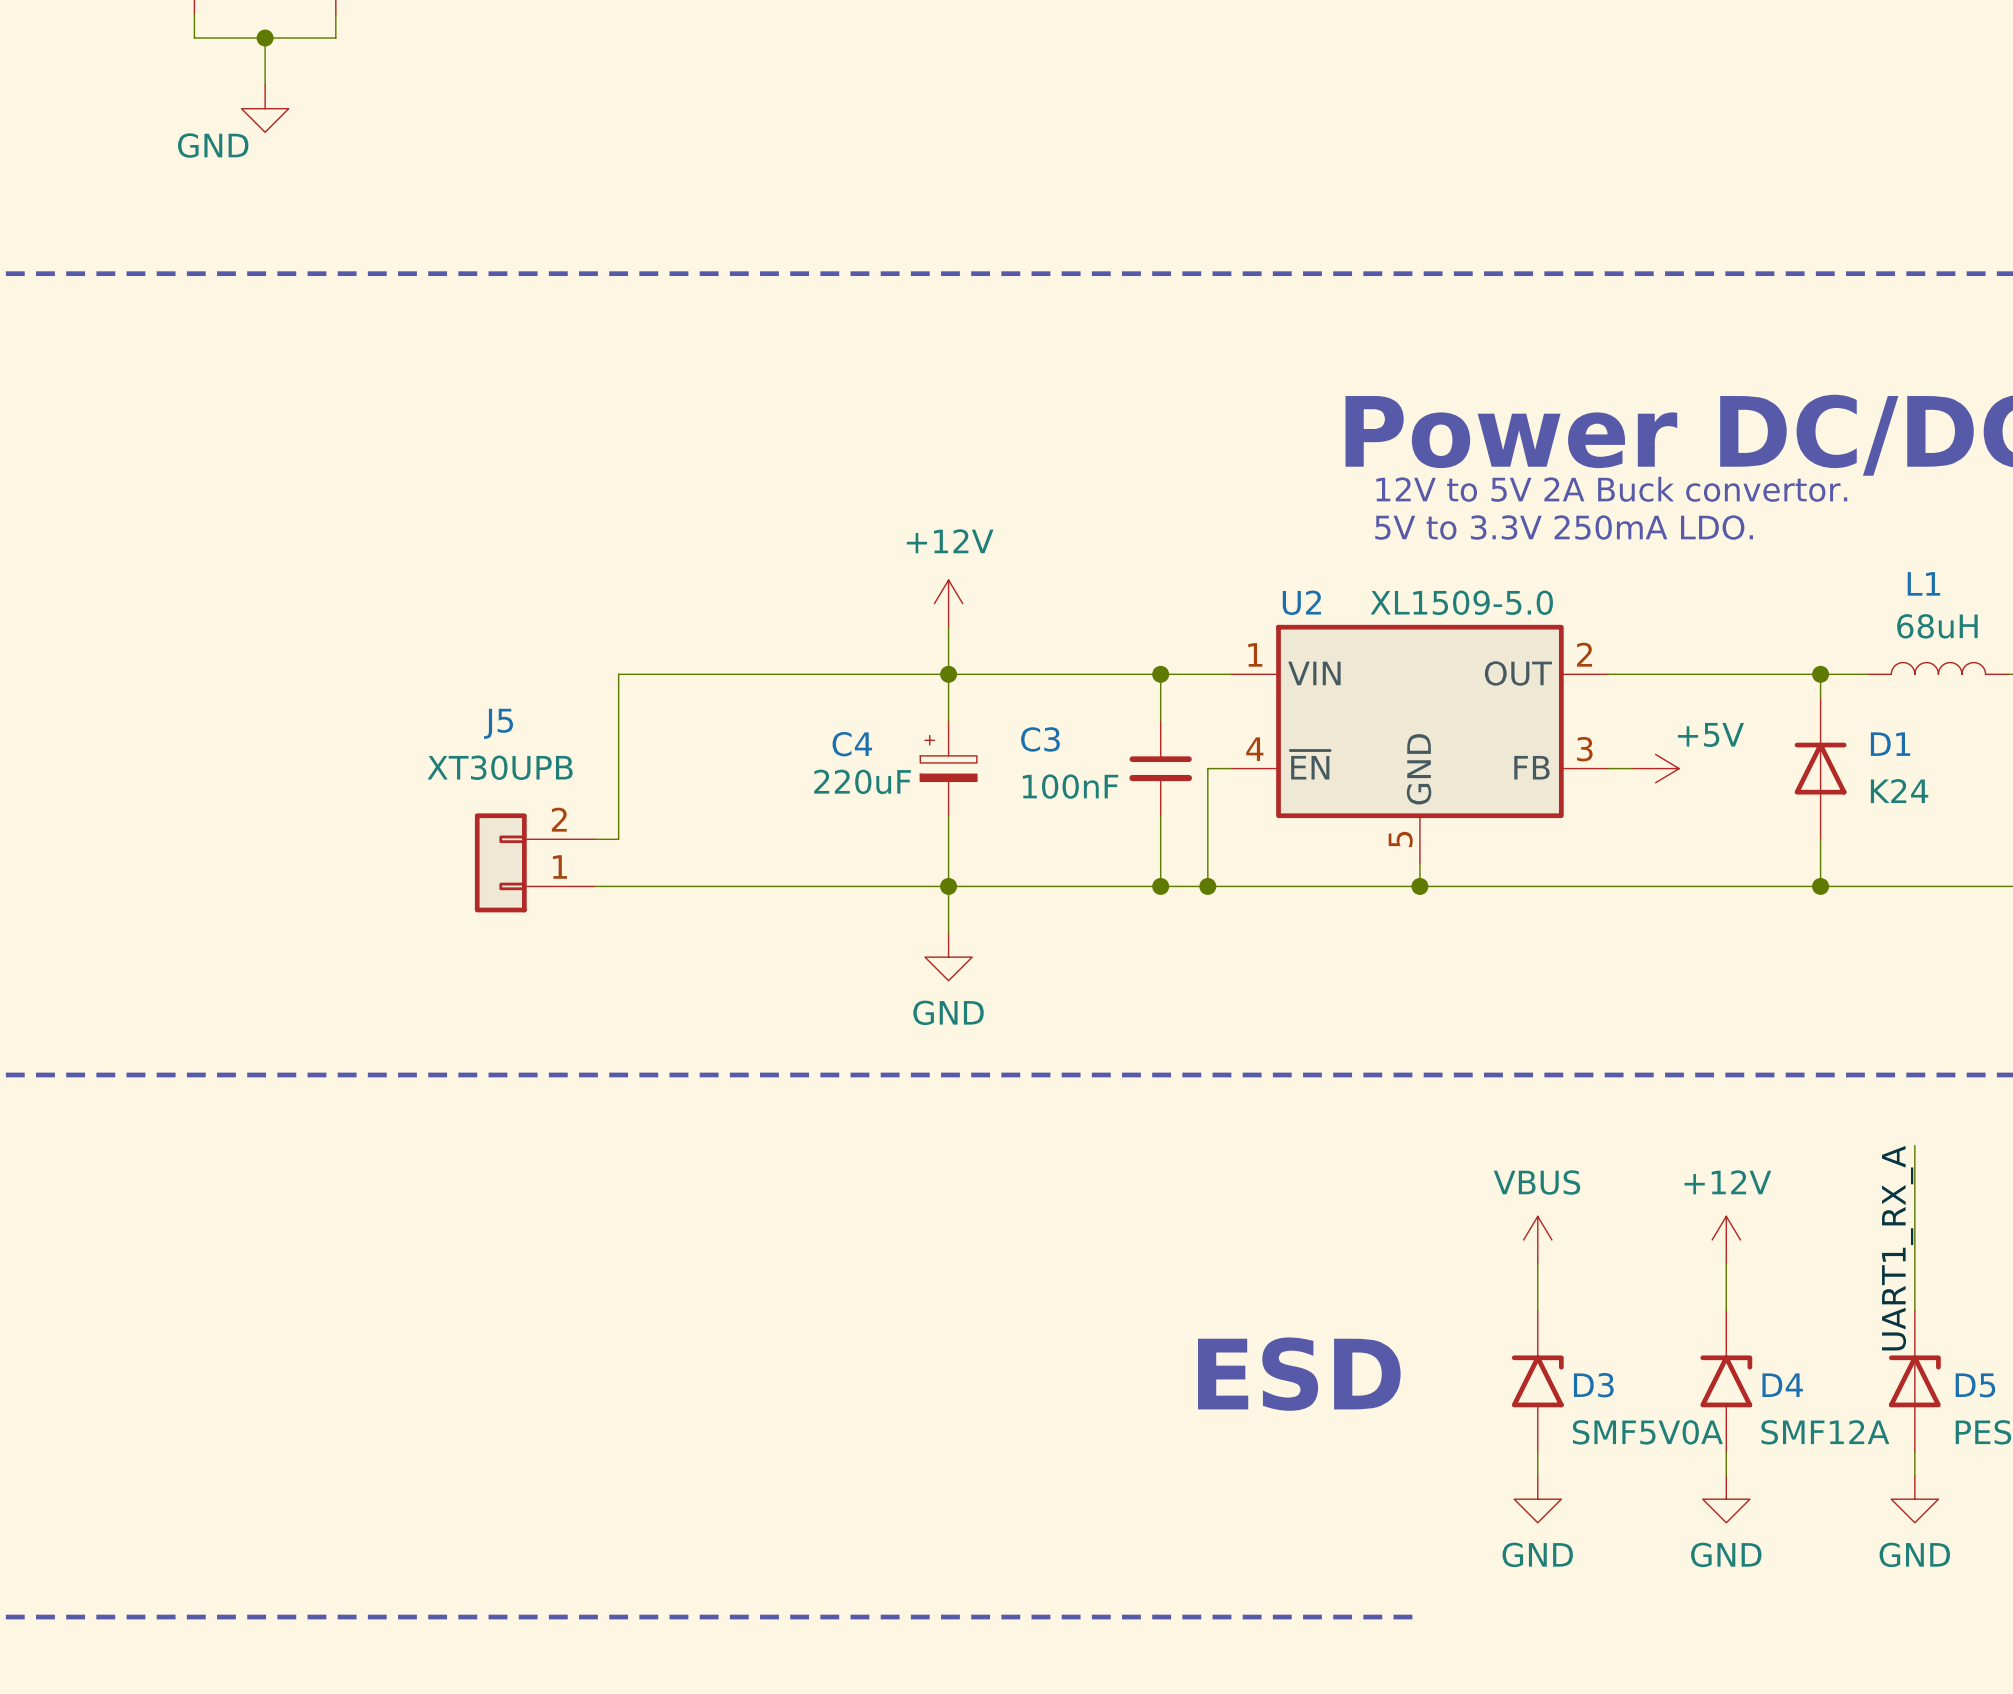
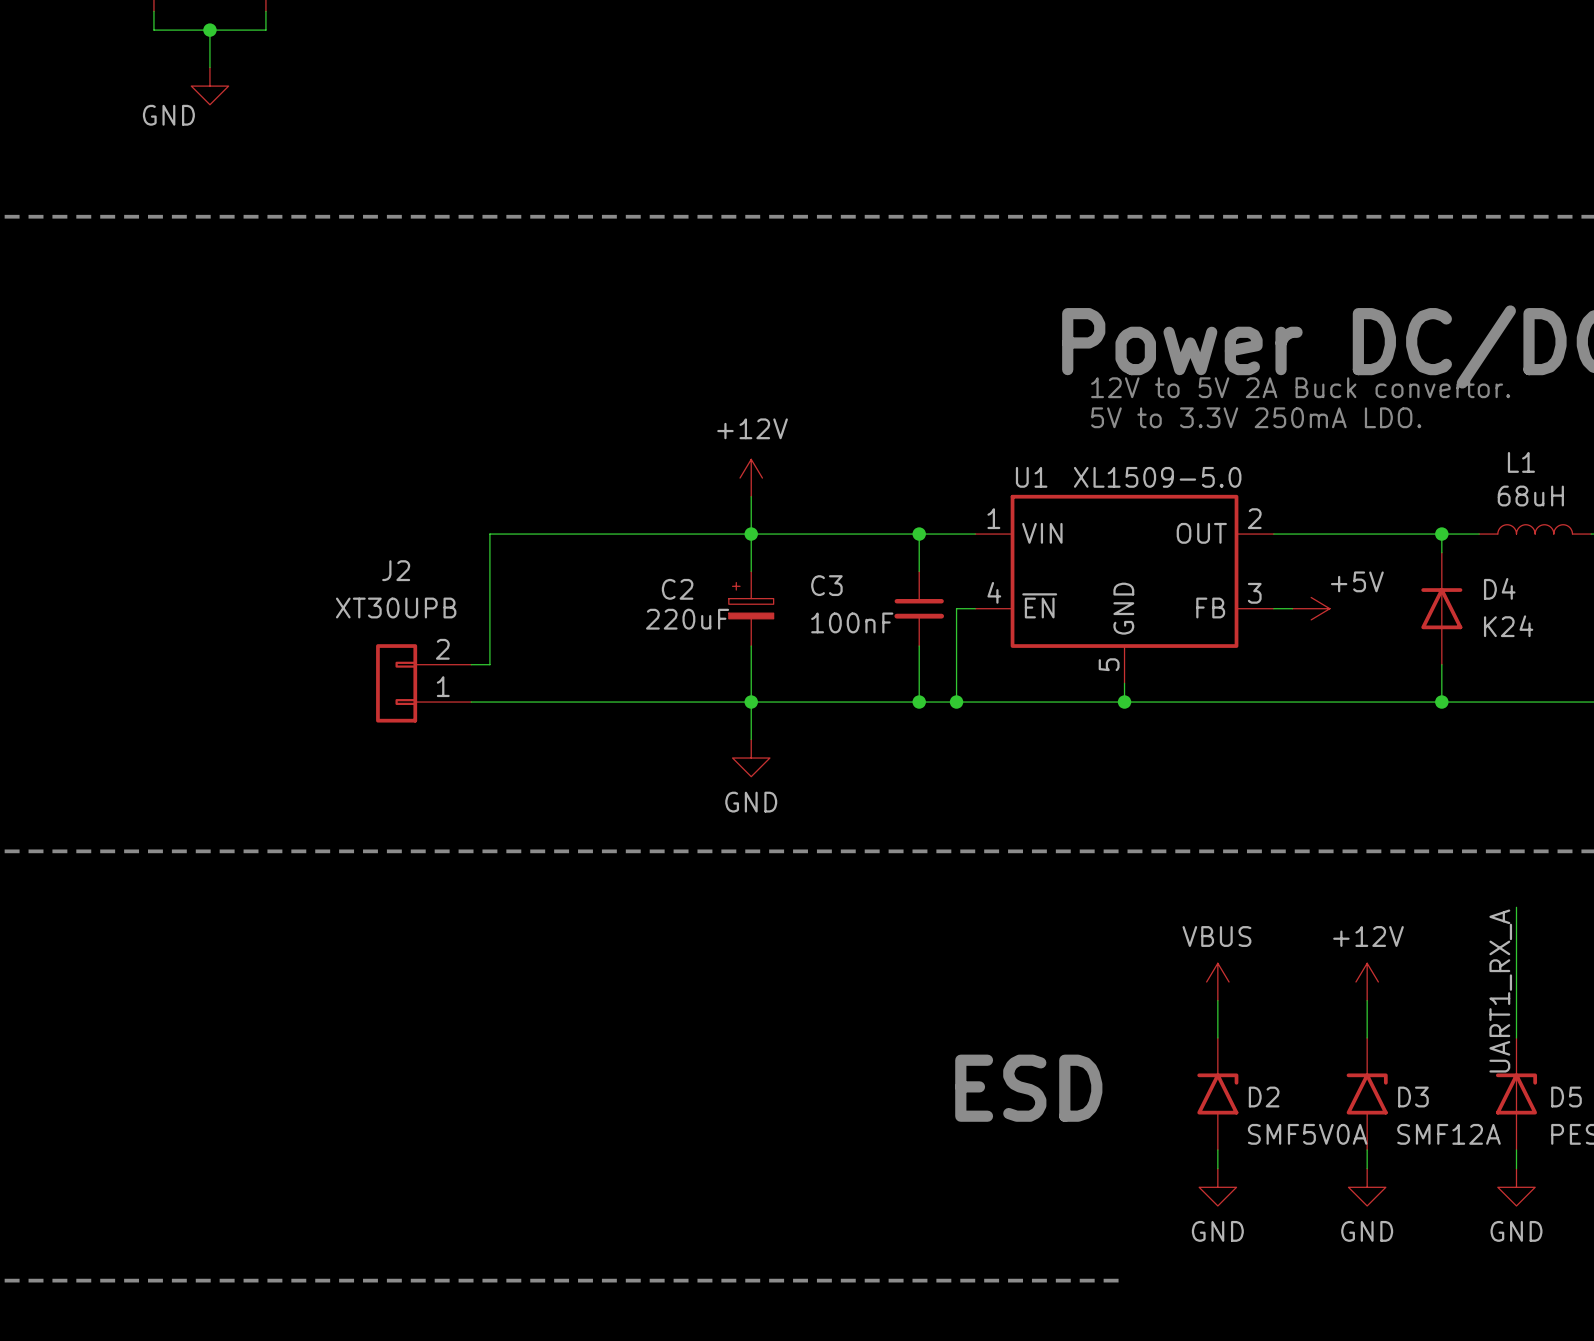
U2 name: U2 (1301, 602) -> U1 (1031, 477)
J5 name: J5 (498, 723) -> J2 (396, 570)
C4 name: C4 (852, 744) -> C2 (677, 589)
D1 name: D1 (1890, 744) -> D4 (1499, 588)
D3 name: D3 (1593, 1385) -> D2 (1264, 1097)
D4 name: D4 (1782, 1385) -> D3 (1413, 1097)

